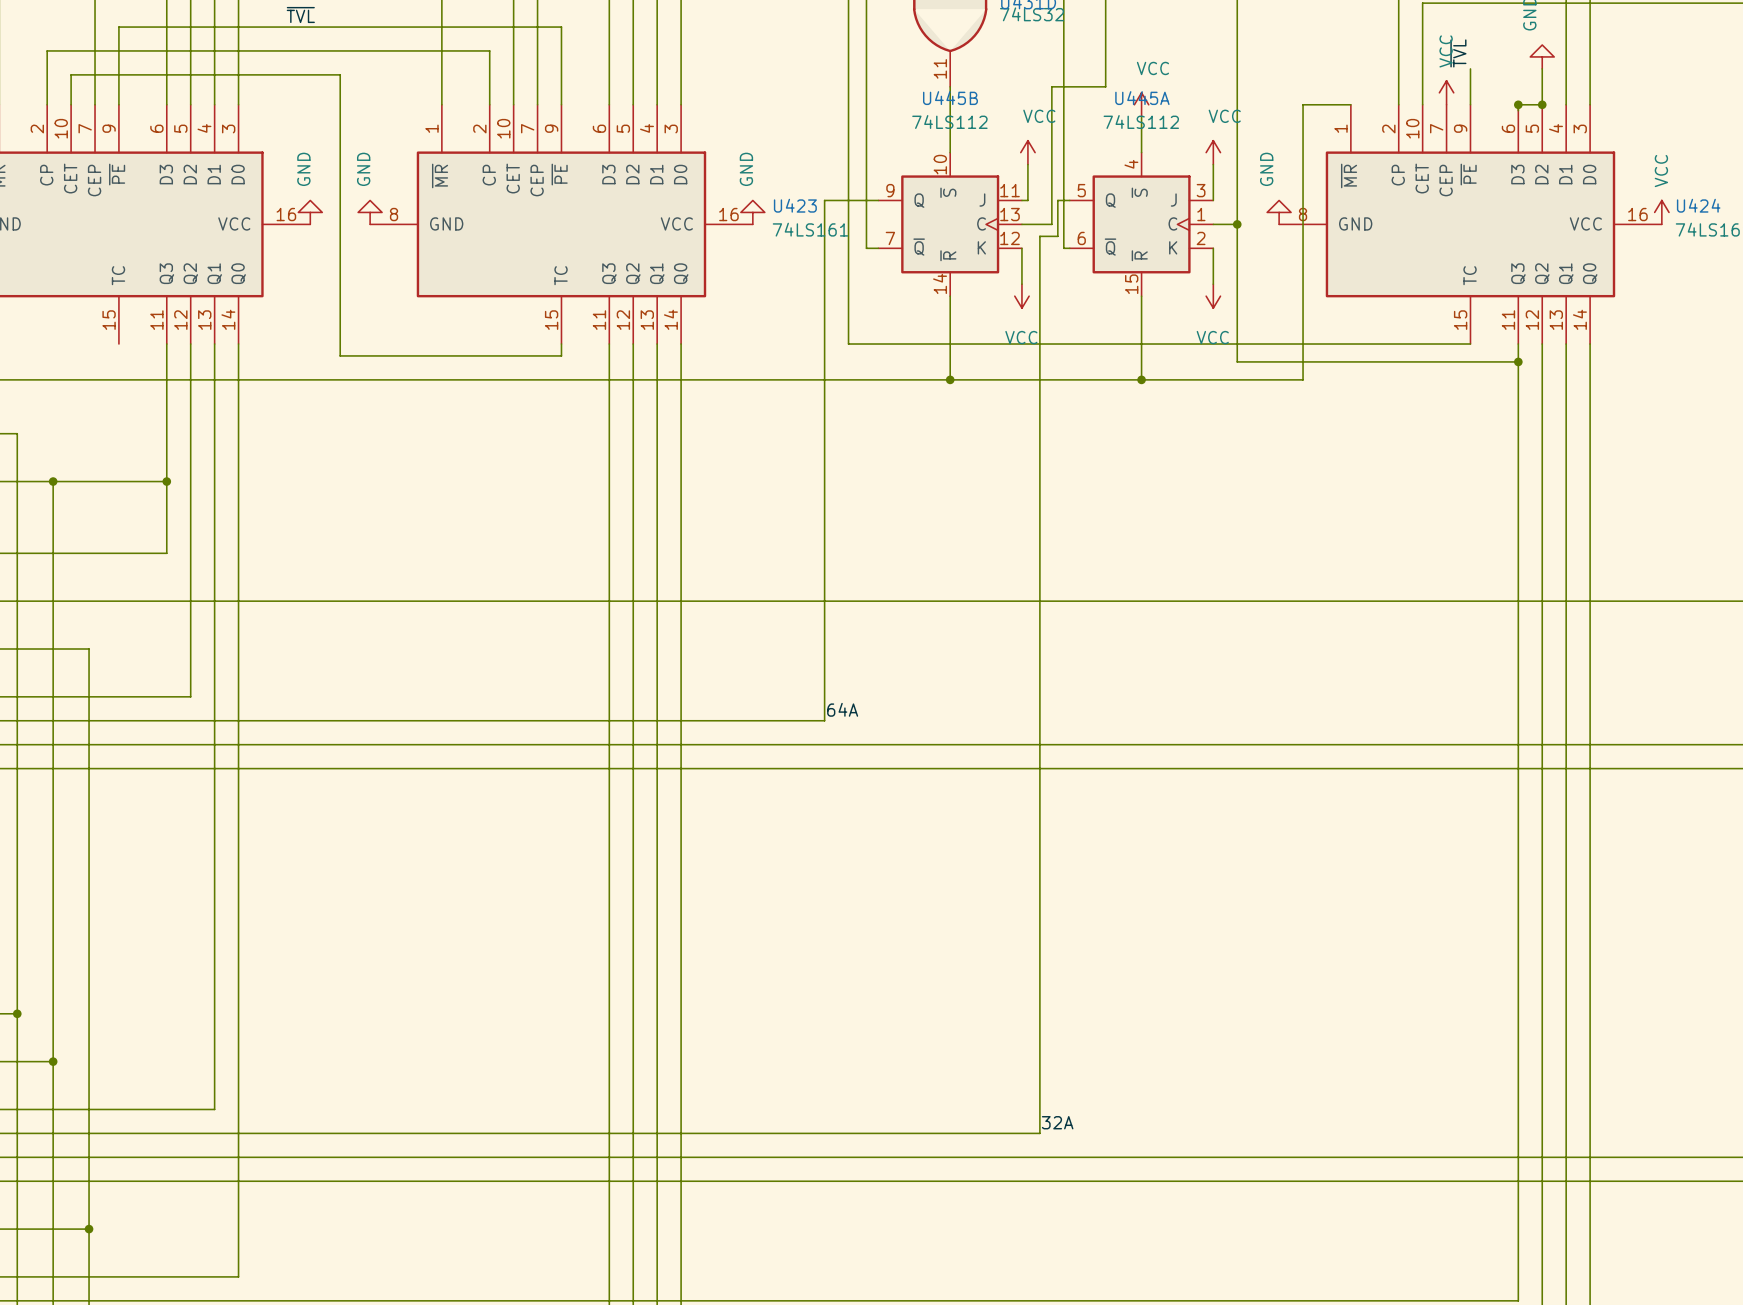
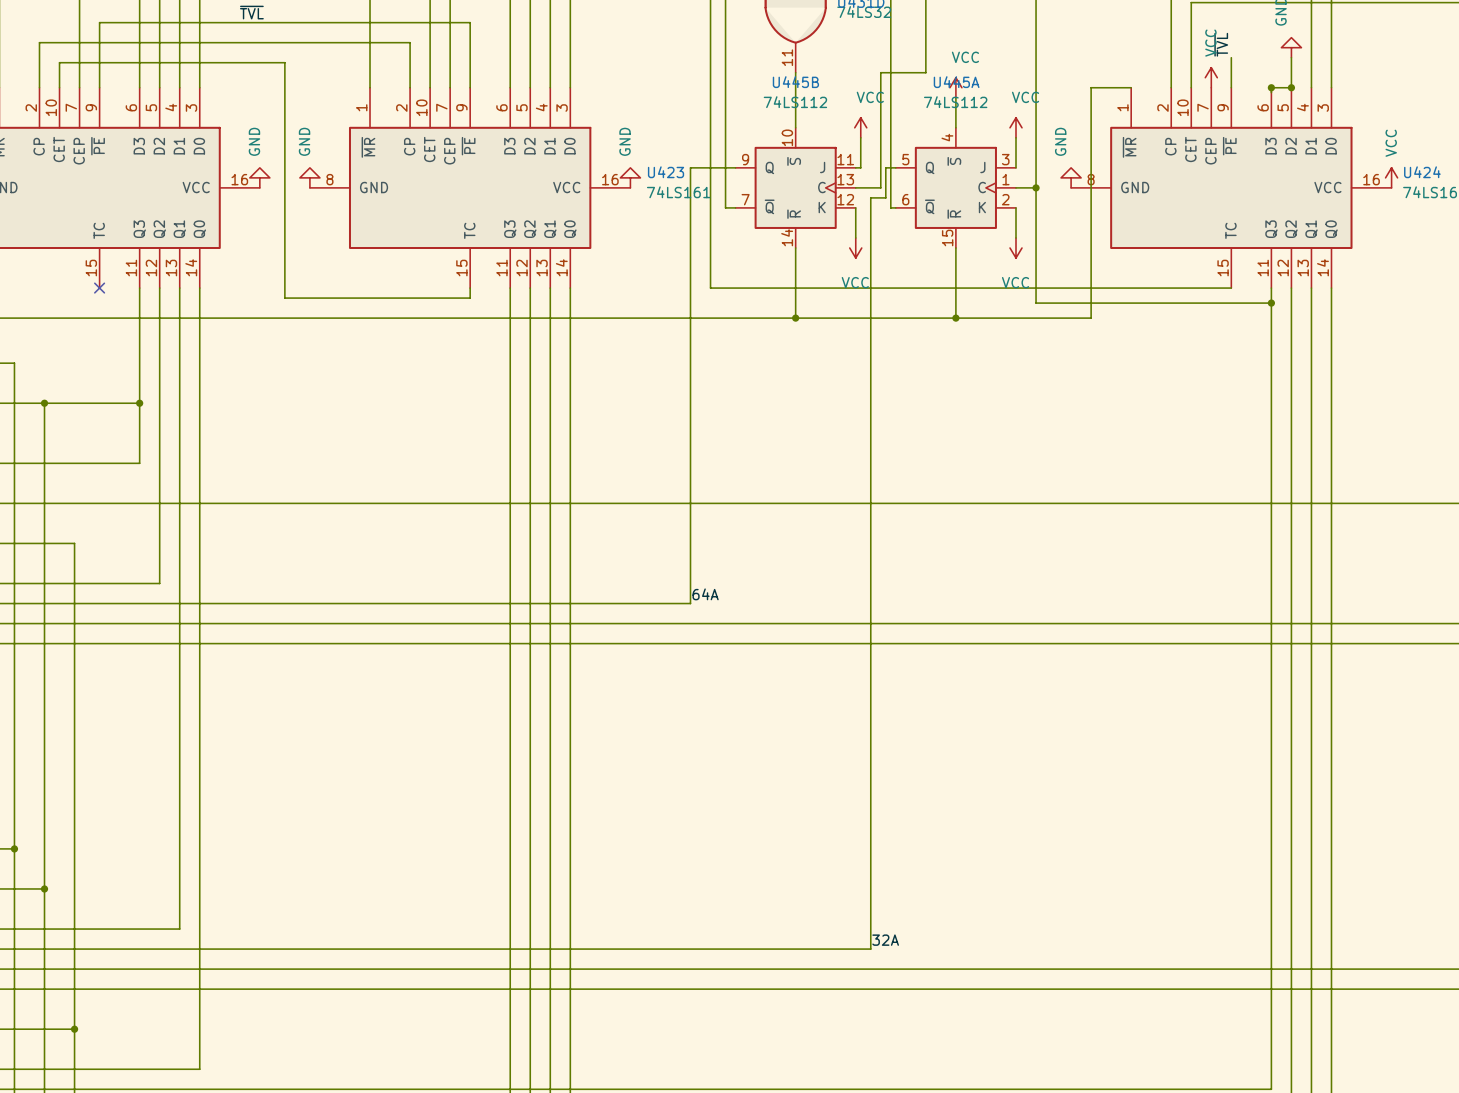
no-connect mark: none -> (99, 288)

